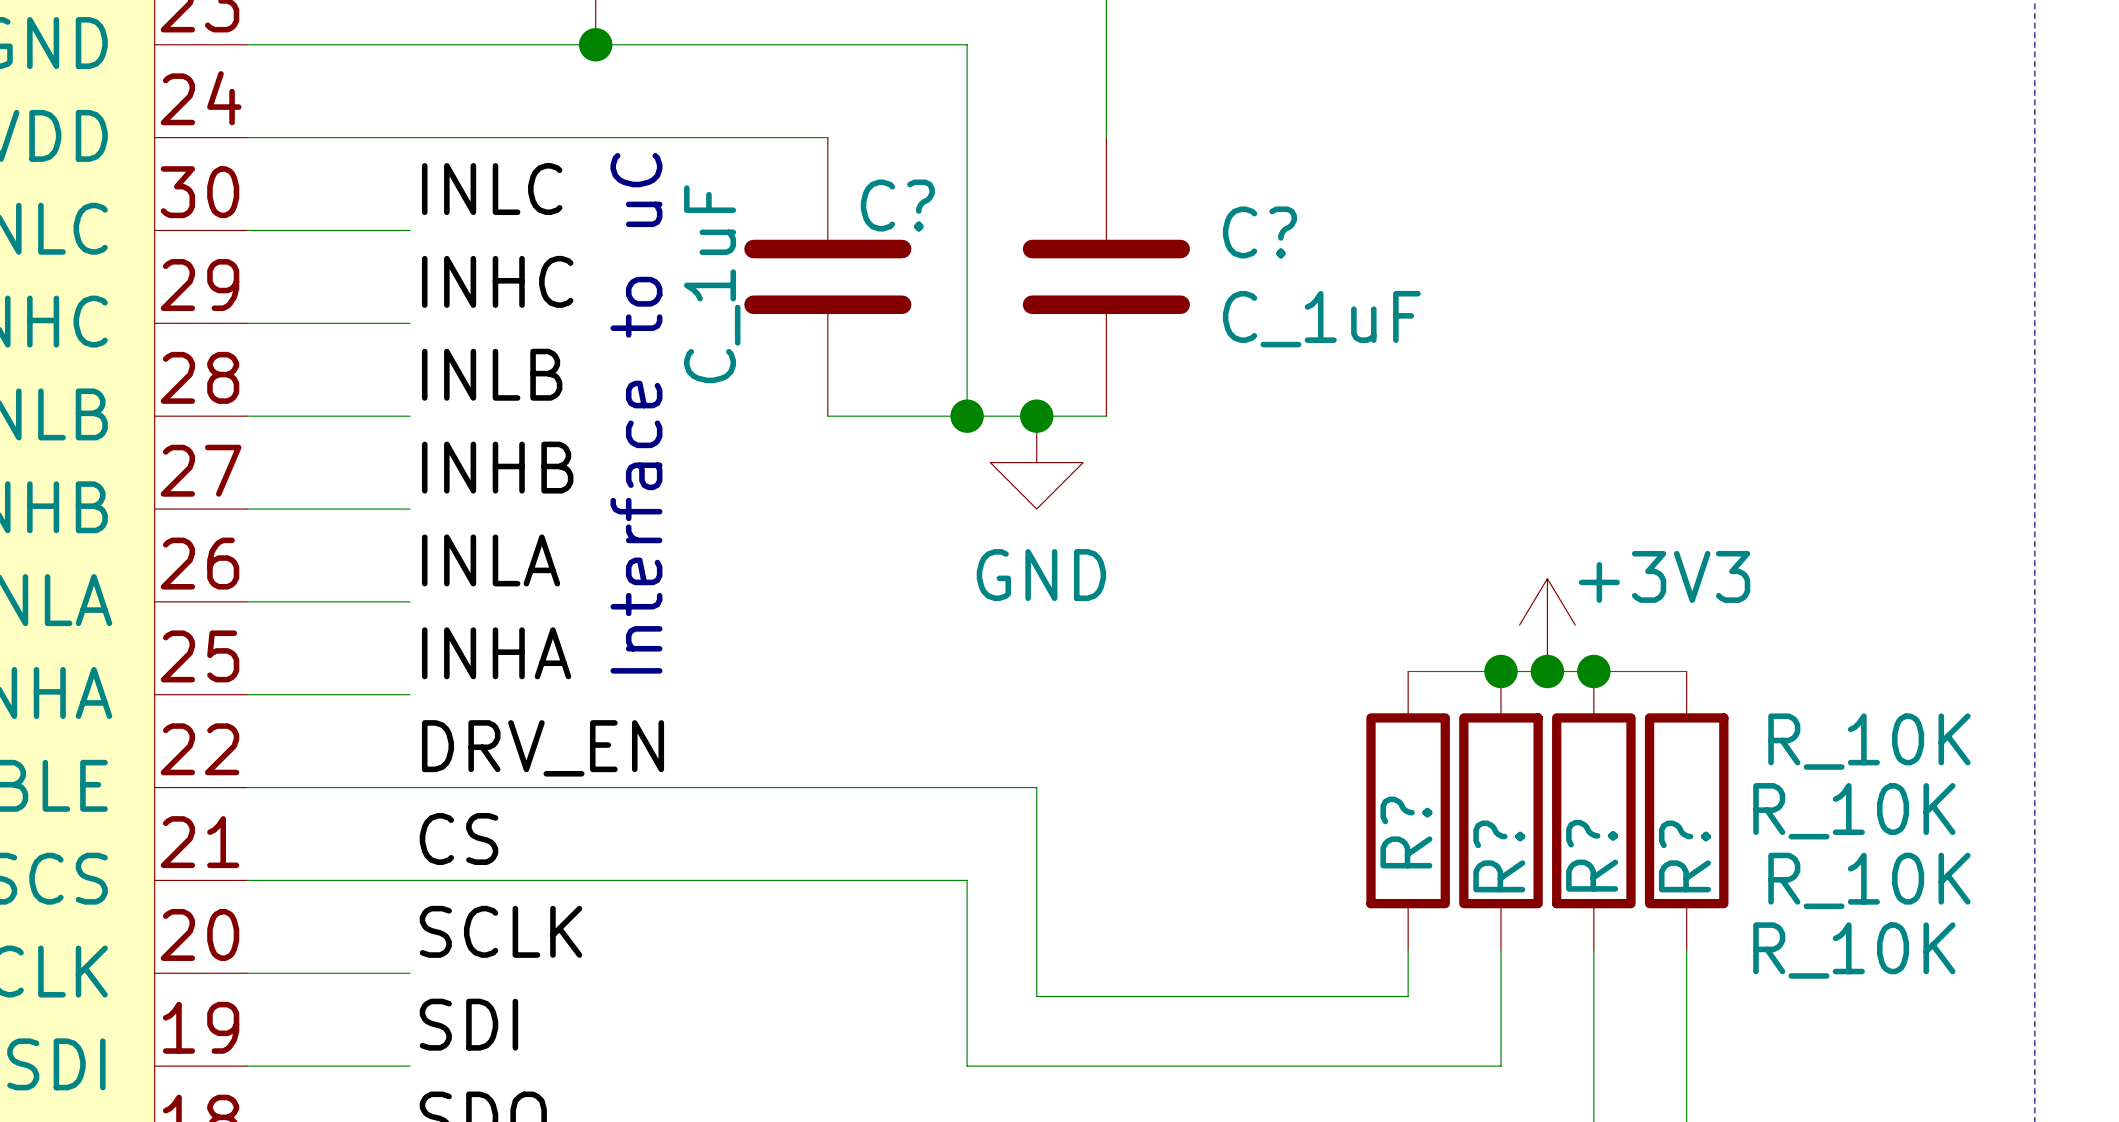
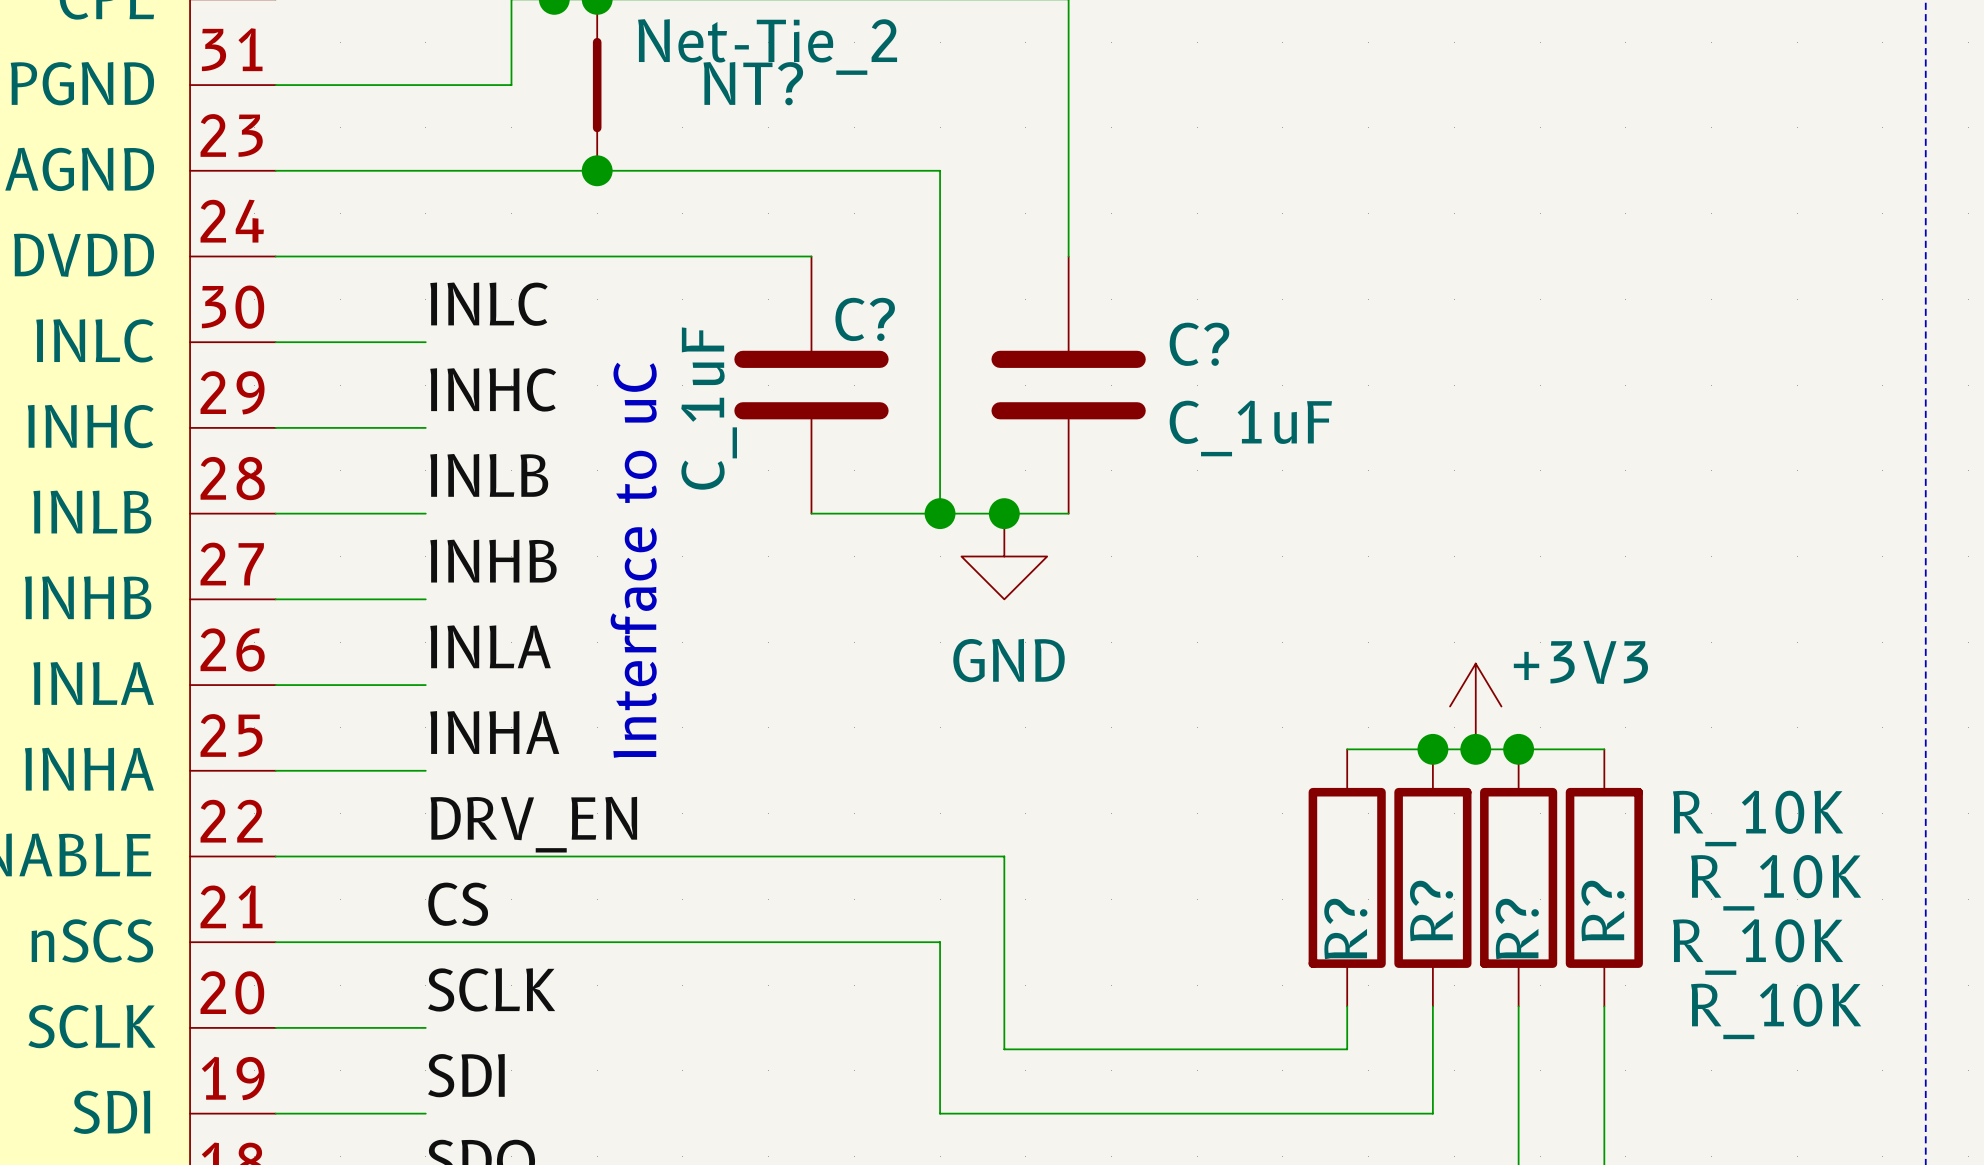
R? name position: R? (1406, 832) -> R? (1345, 929)

